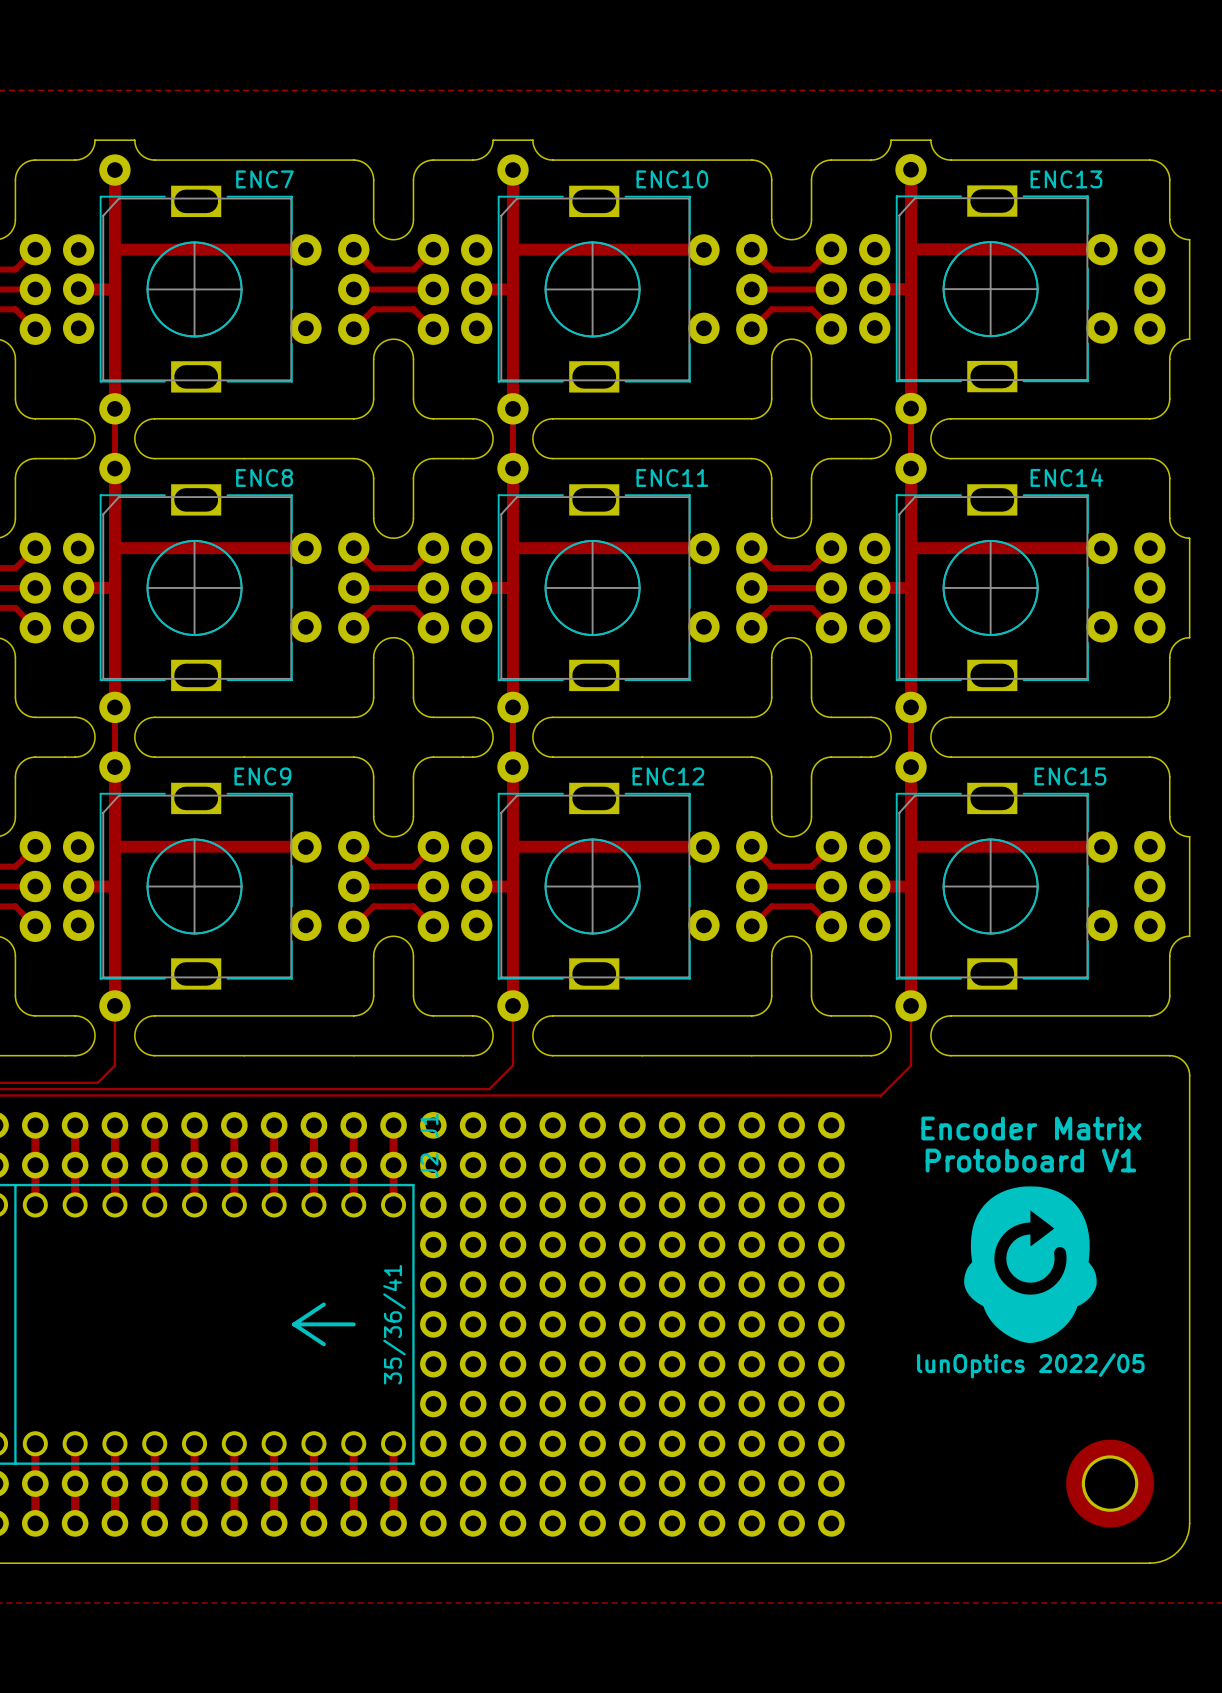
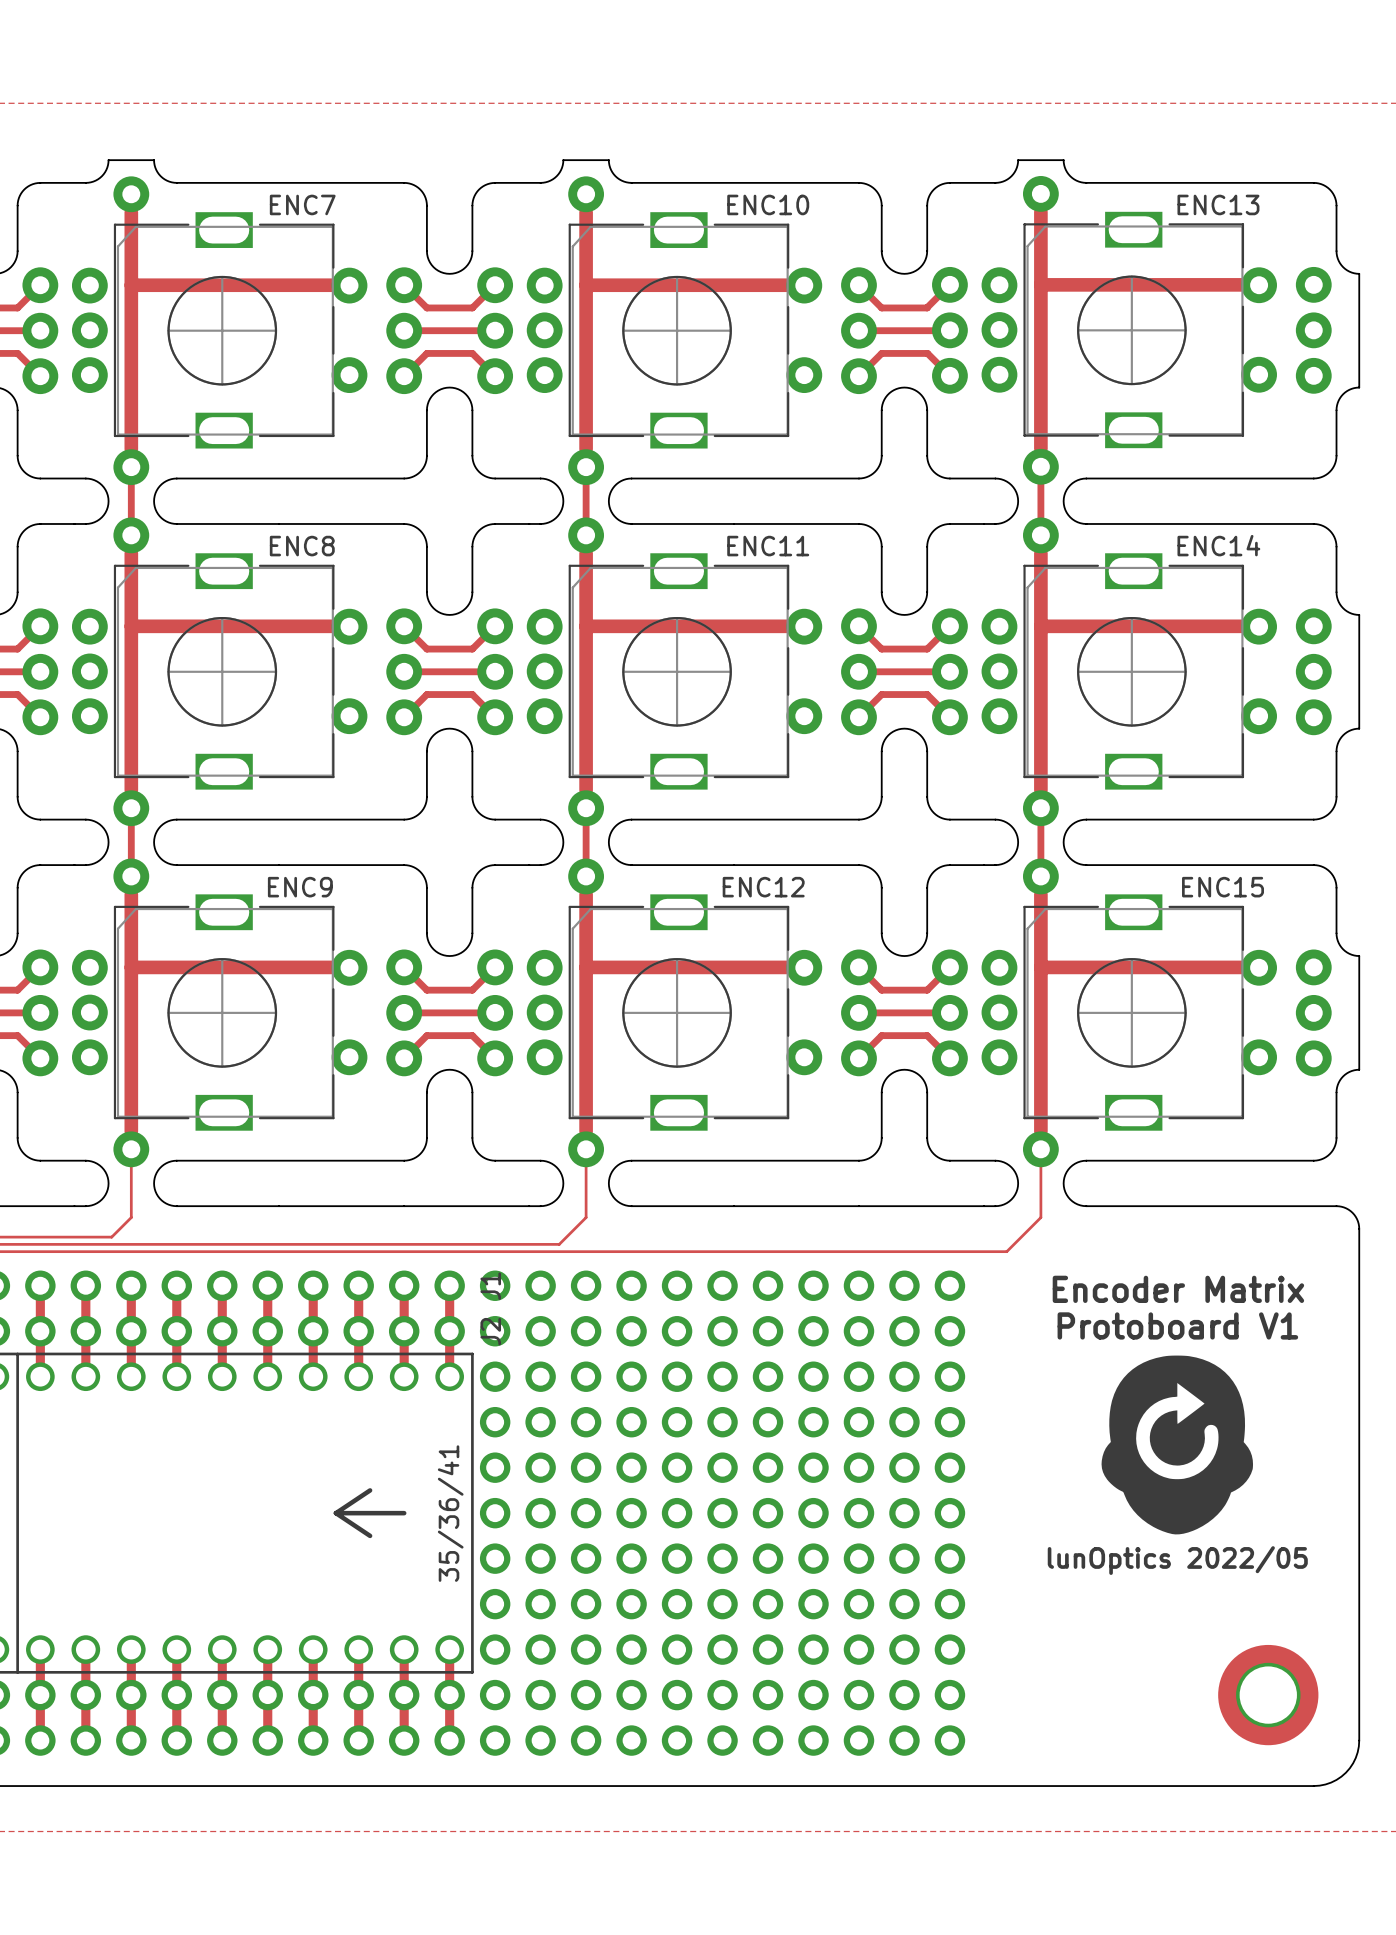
ENC7 footprint: [19, 154, 370, 425] -> [22, 176, 423, 486]
ENC10 footprint: [417, 154, 768, 425] -> [477, 176, 877, 486]
ENC13 footprint: [815, 154, 1166, 425] -> [932, 176, 1332, 485]
ENC8 footprint: [19, 452, 370, 724] -> [22, 517, 423, 827]
ENC11 footprint: [417, 452, 768, 724] -> [477, 517, 877, 827]
ENC14 footprint: [815, 452, 1166, 724] -> [932, 517, 1332, 827]
ENC9 footprint: [19, 751, 370, 1022] -> [22, 858, 423, 1168]
ENC12 footprint: [417, 751, 768, 1022] -> [477, 858, 877, 1168]
ENC15 footprint: [815, 751, 1166, 1022] -> [932, 858, 1332, 1168]

